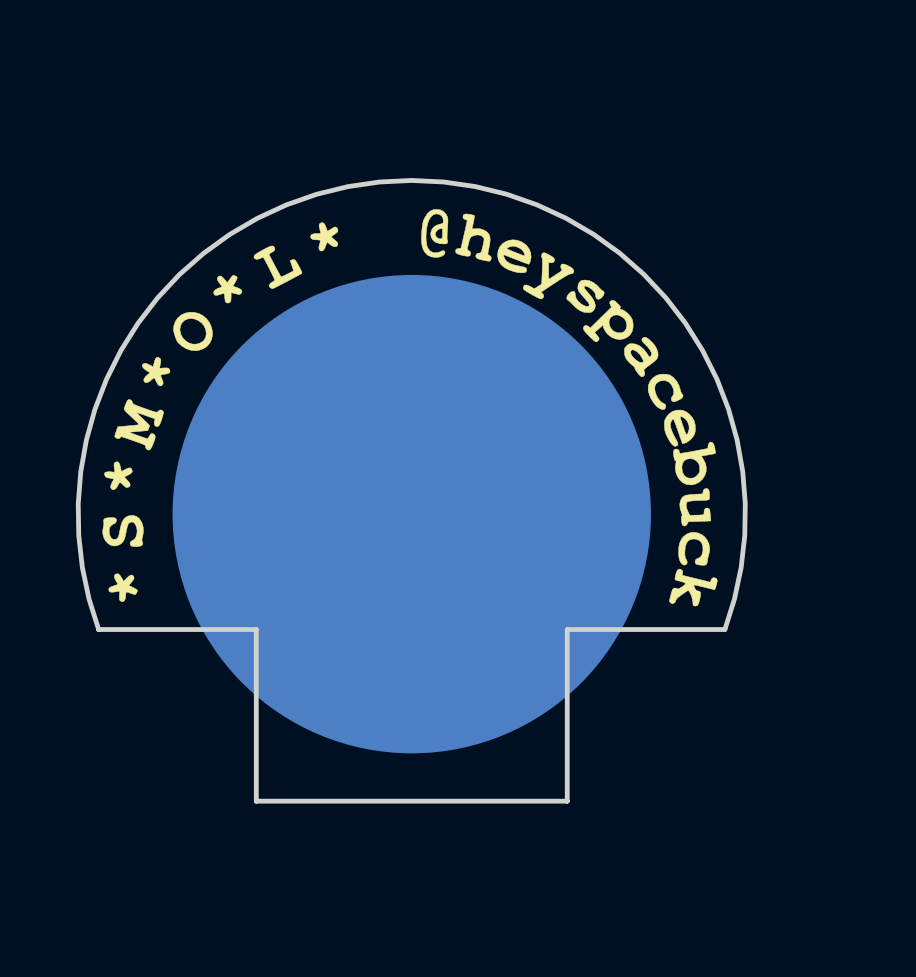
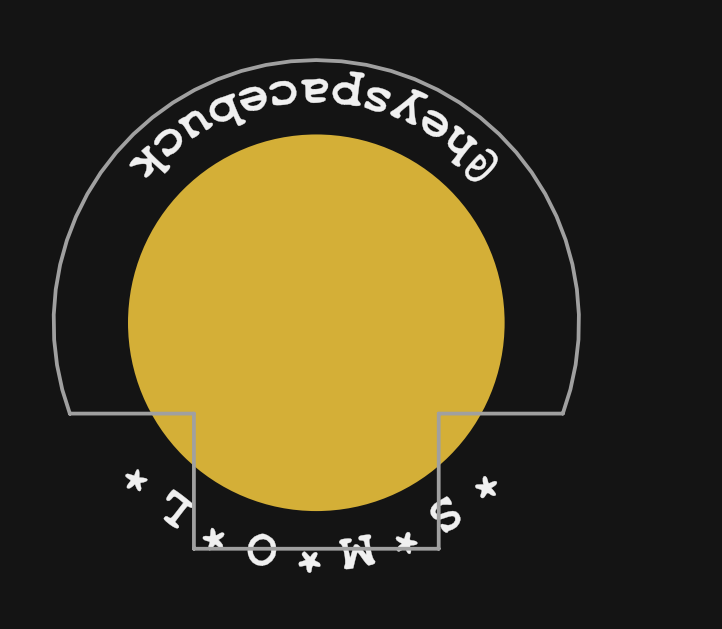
drawing: none -> [125, 71, 498, 573]
drawing: [421, 209, 718, 607] -> none
drawing: [102, 222, 339, 602] -> none

